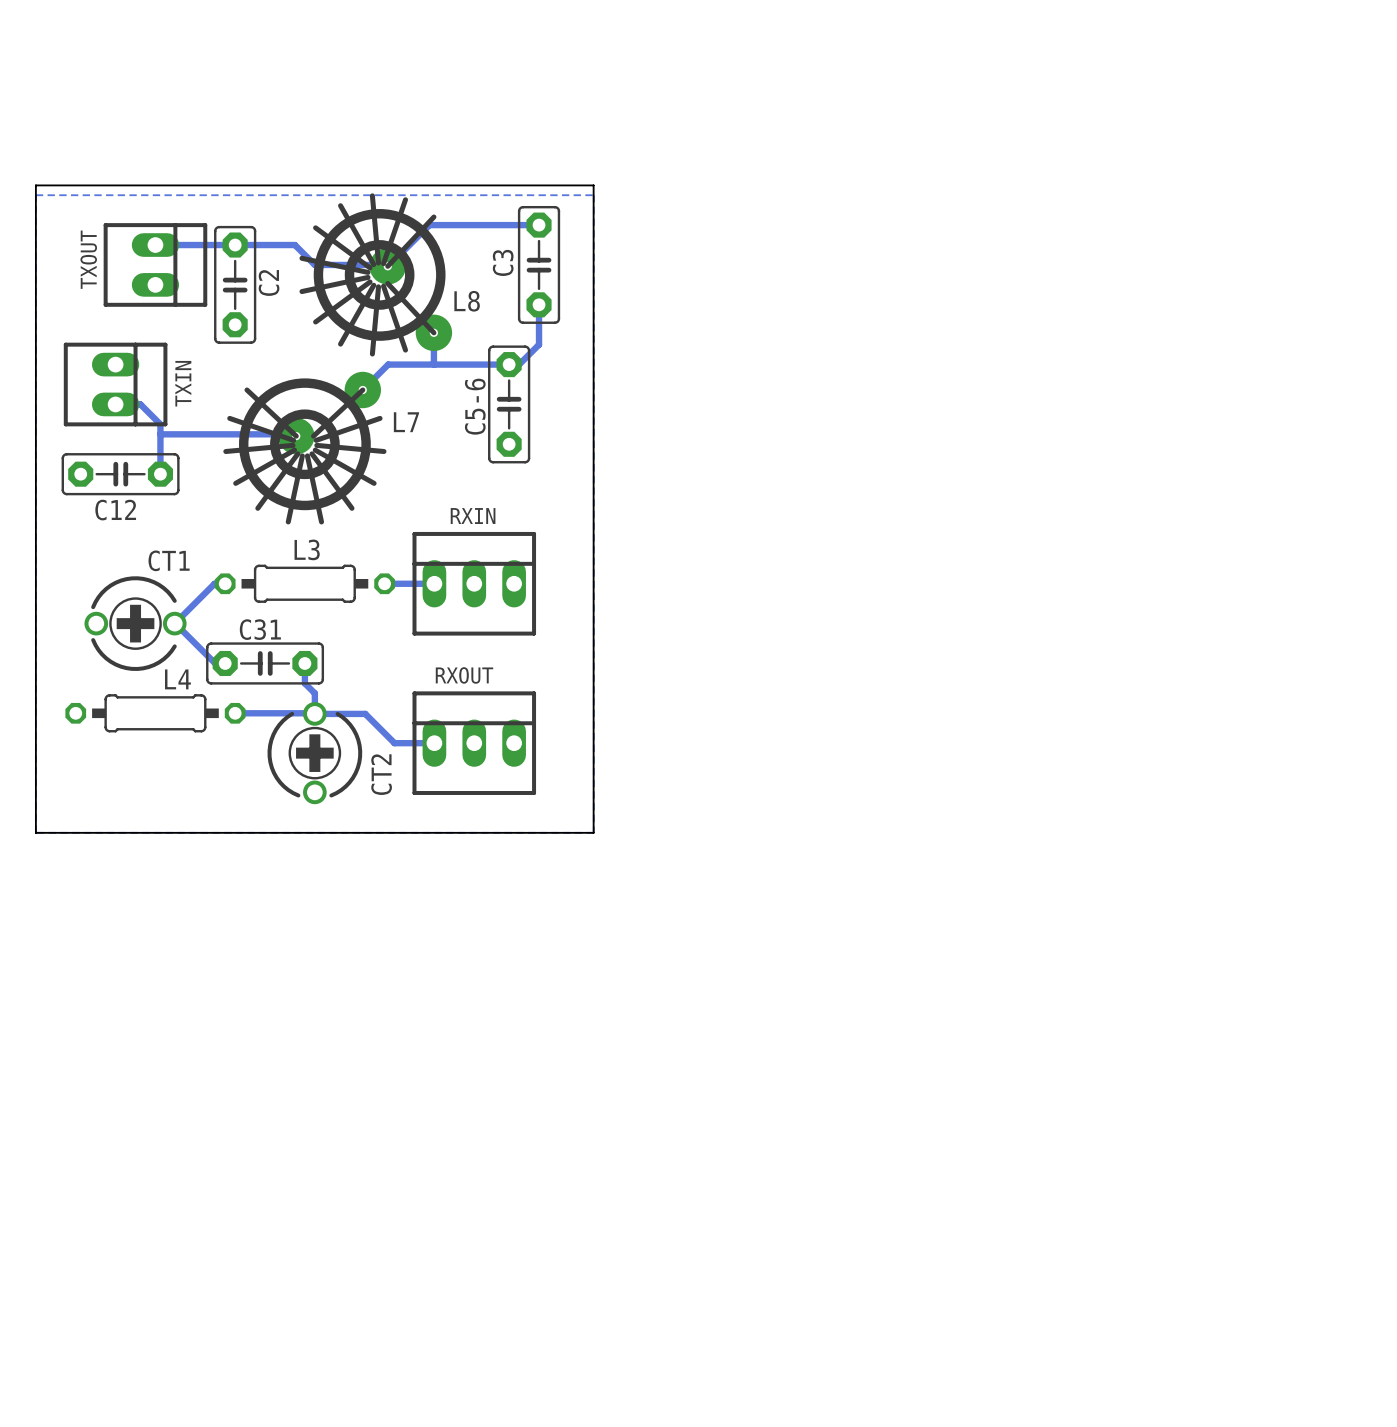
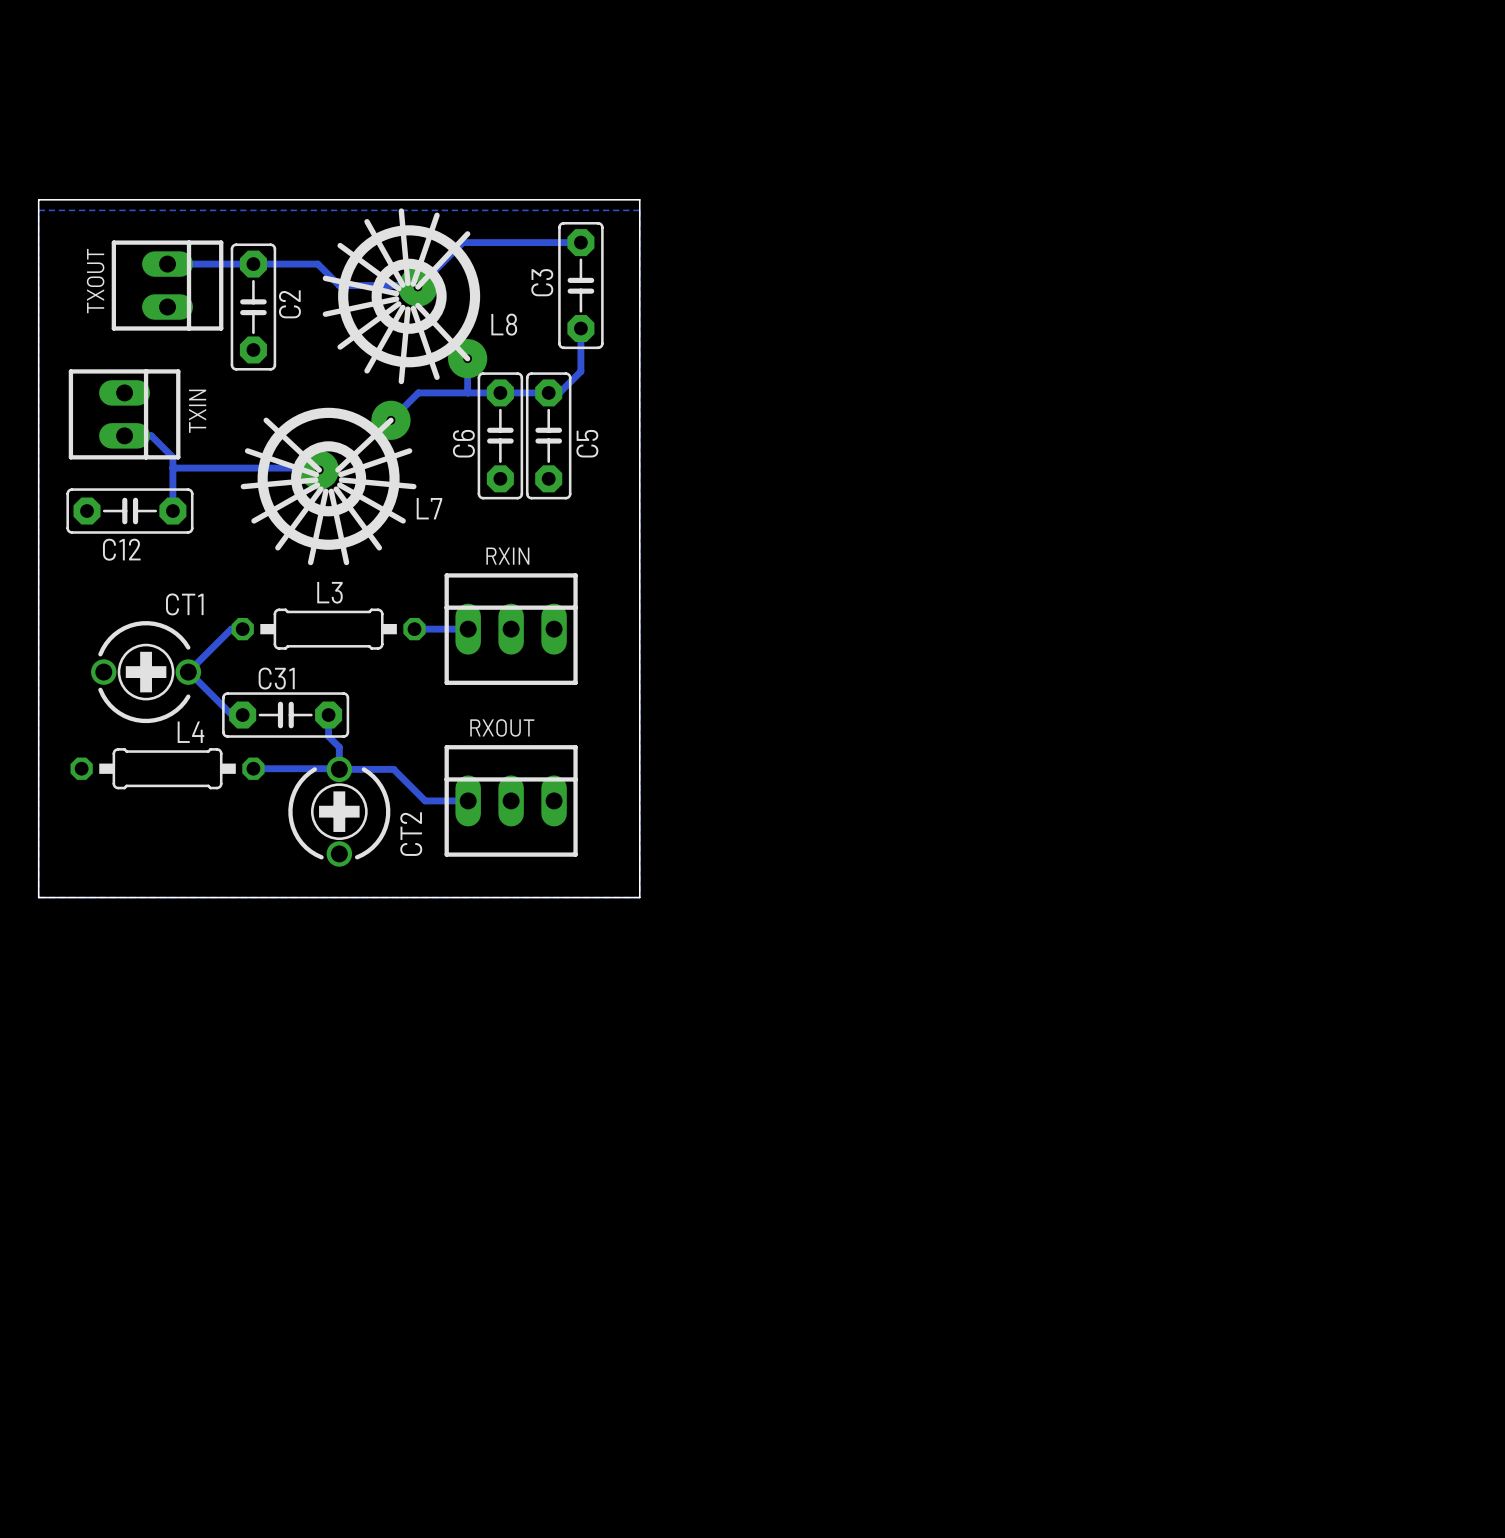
C6: none -> (500, 435)
C5-6 name: C5-6 (475, 406) -> C5 (587, 443)
L7 name position: L7 (406, 422) -> L7 (429, 508)

